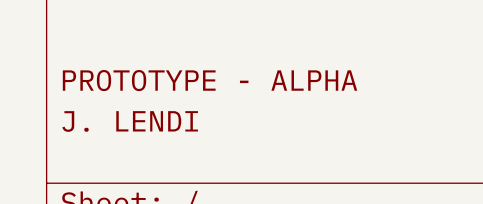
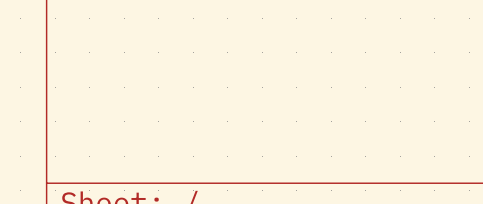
title block: PROTOTYPE - ALPHA (210, 80) -> none
title block: J. LENDI (130, 121) -> none

